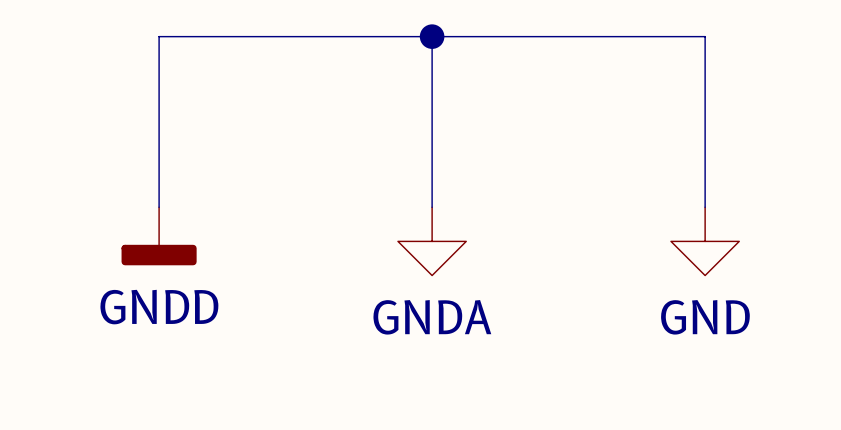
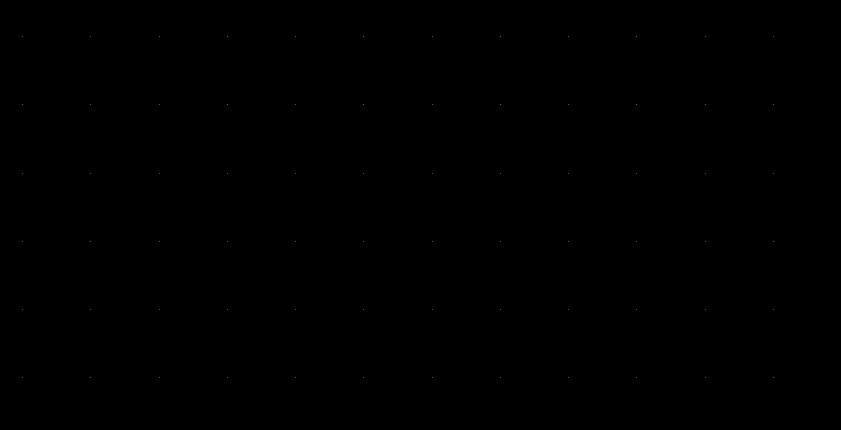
wire: (432, 36) (432, 207) -> none
junction: (432, 36) -> none
wire: (159, 207) (159, 36) (705, 36) (705, 207) -> none
power symbol: GNDD (159, 236) -> none
power symbol: GNDA (432, 241) -> none
power symbol: GND (705, 241) -> none

